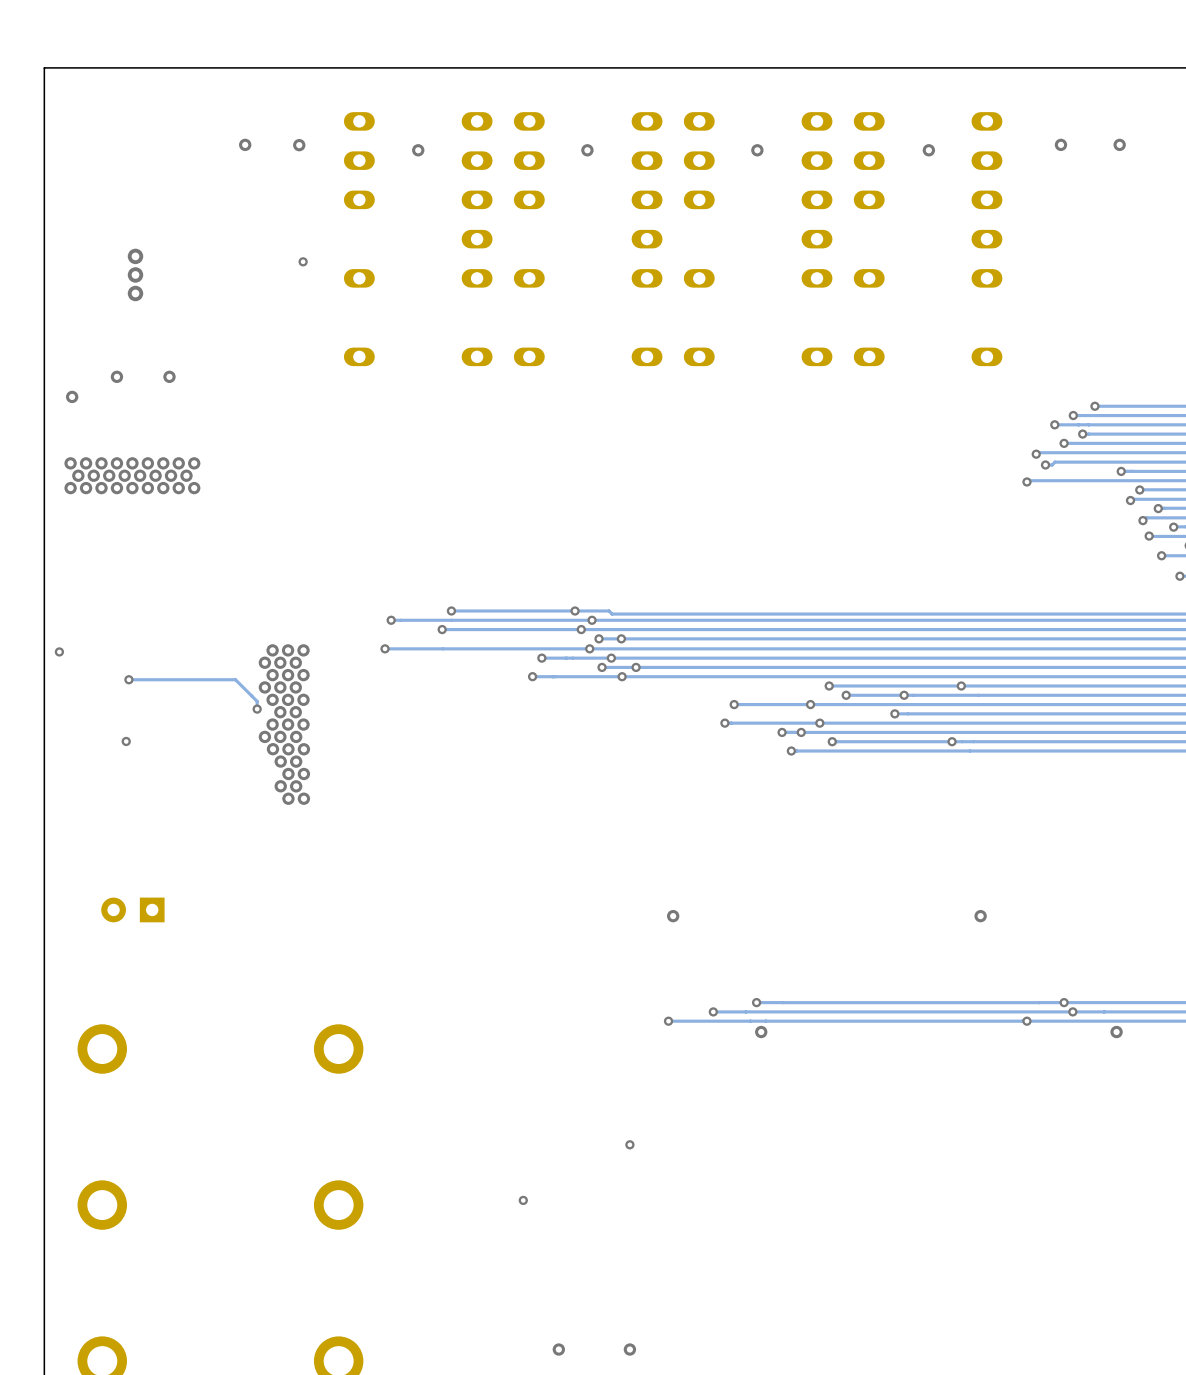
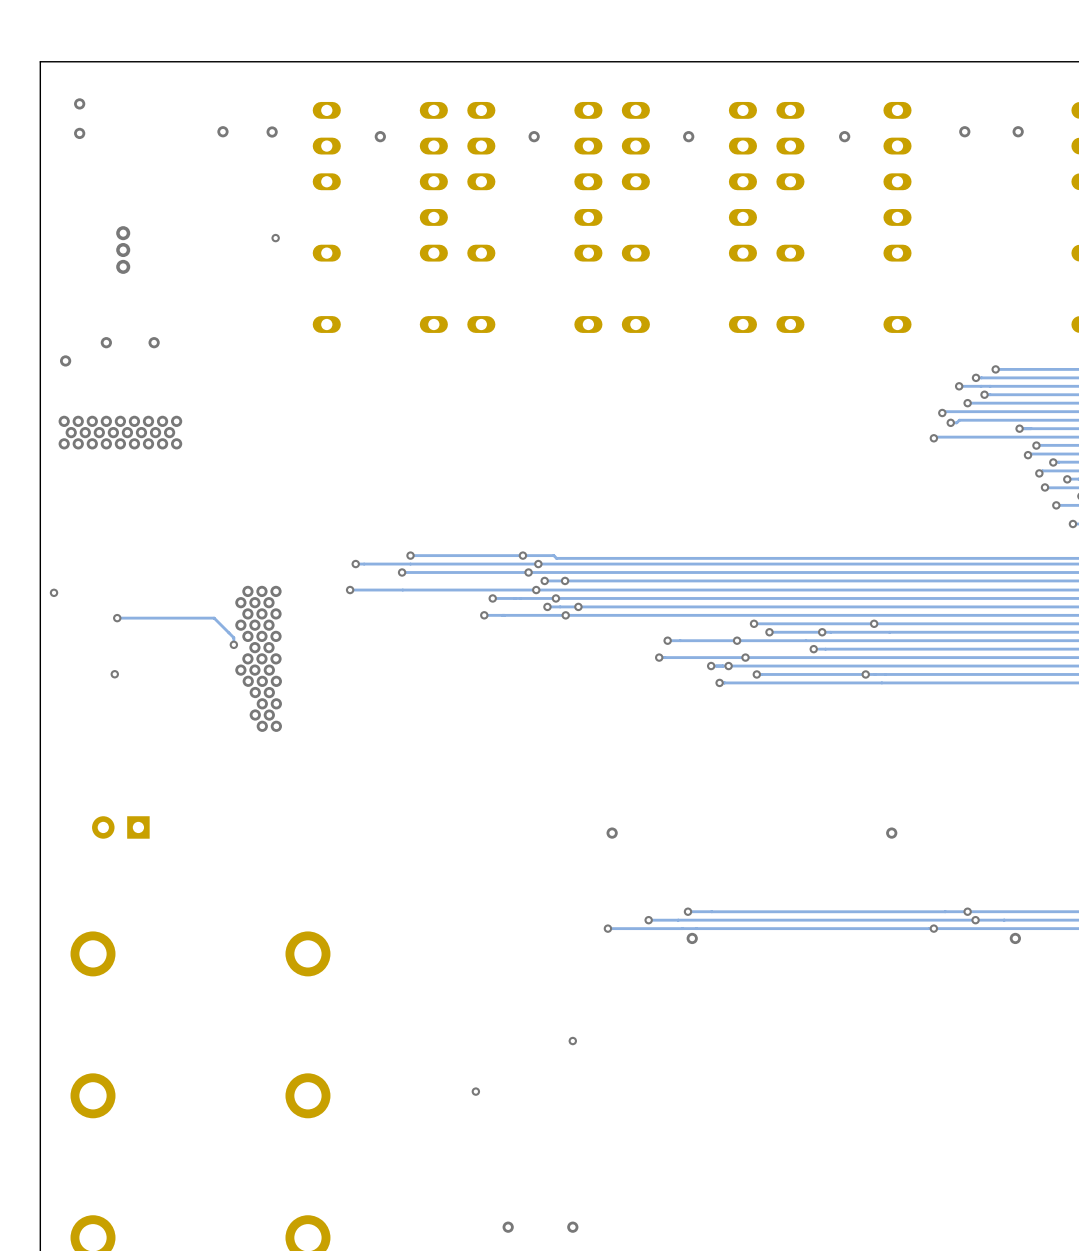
via: none -> (79, 103)
via: none -> (79, 133)

